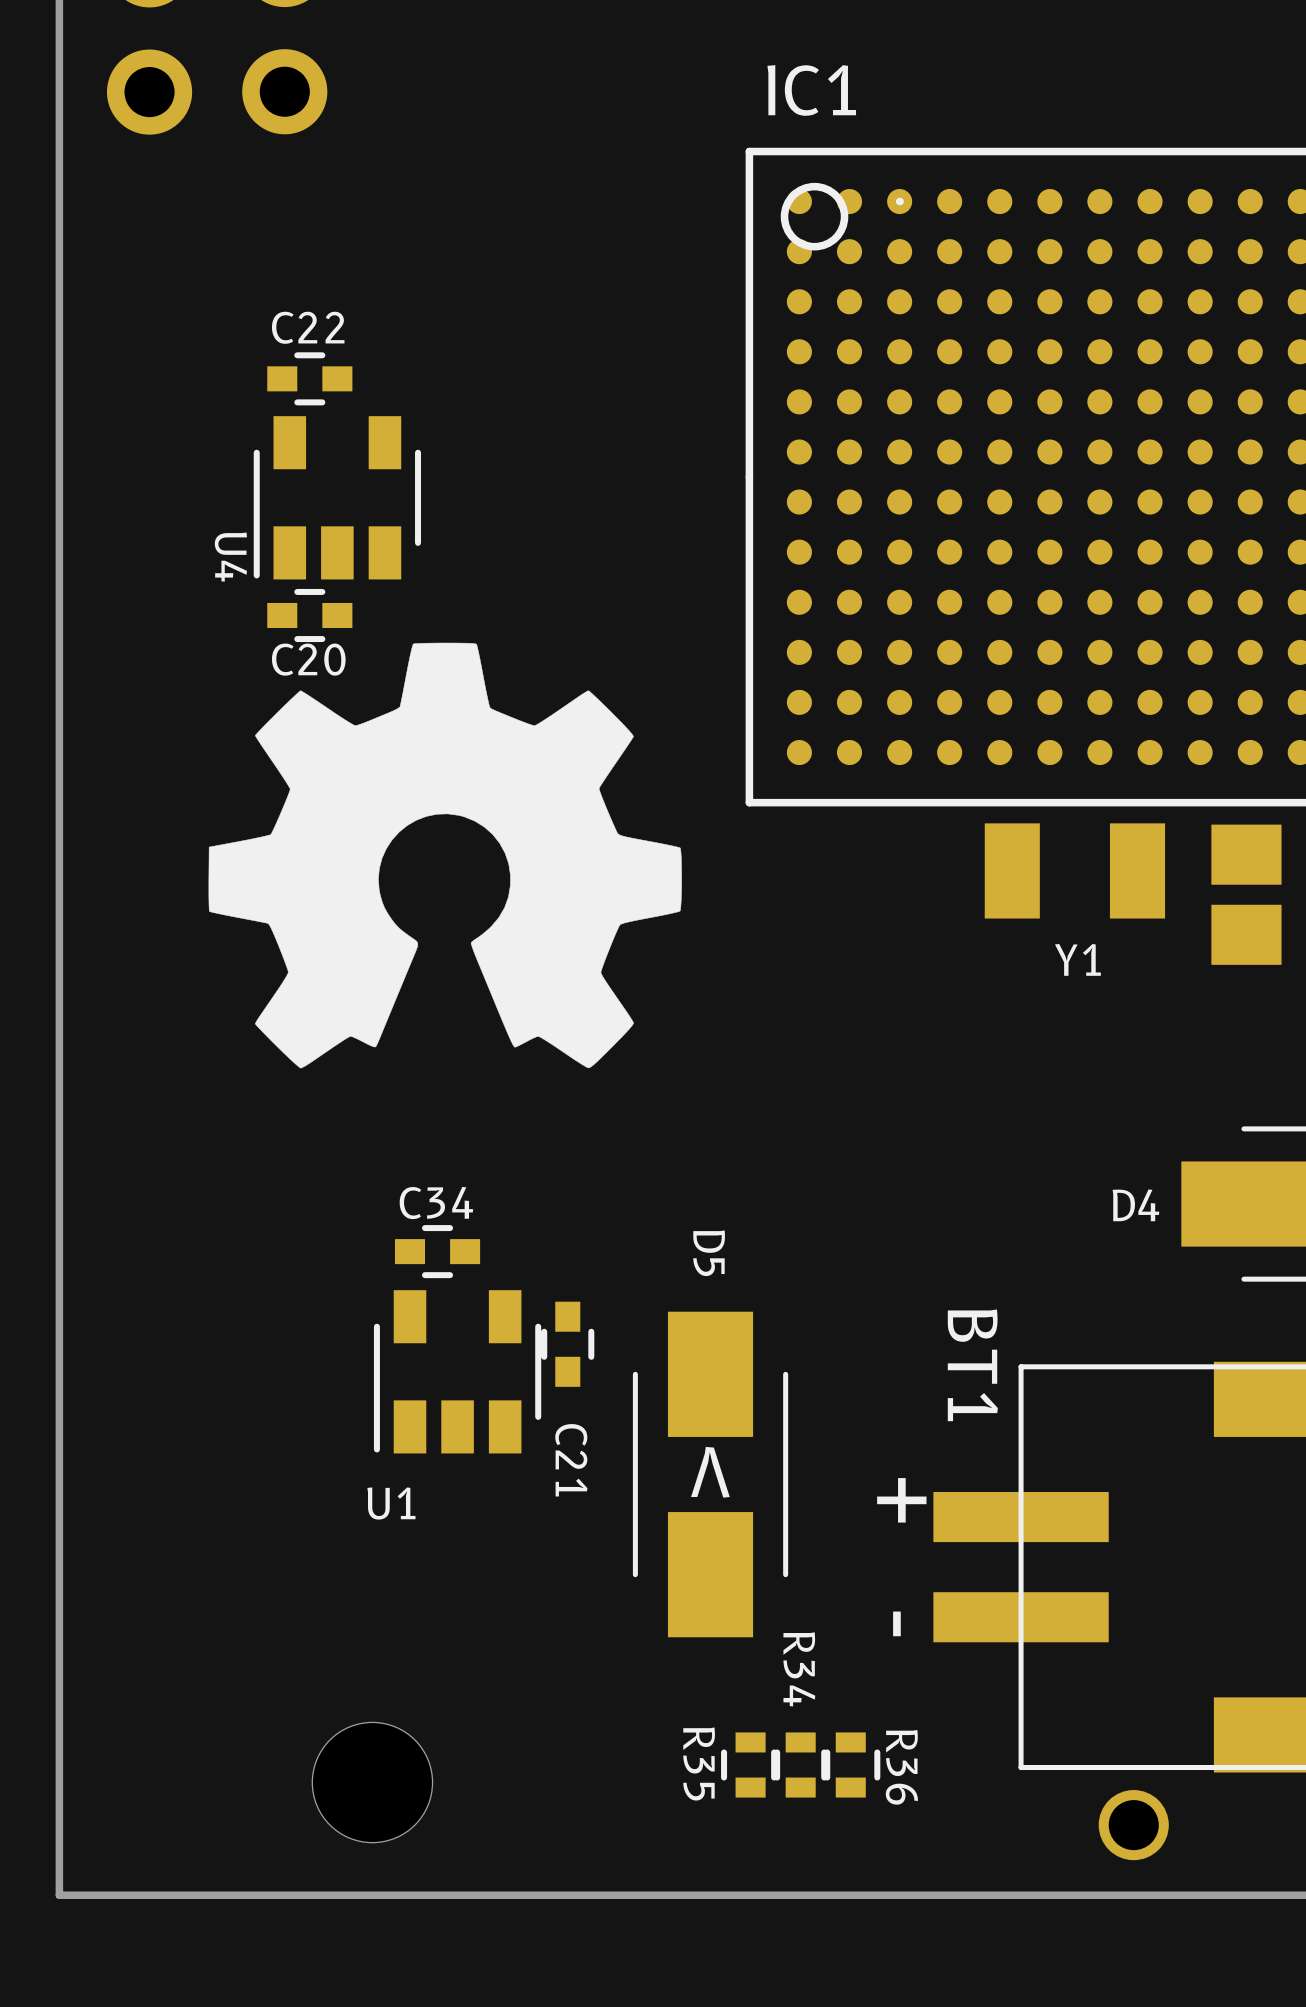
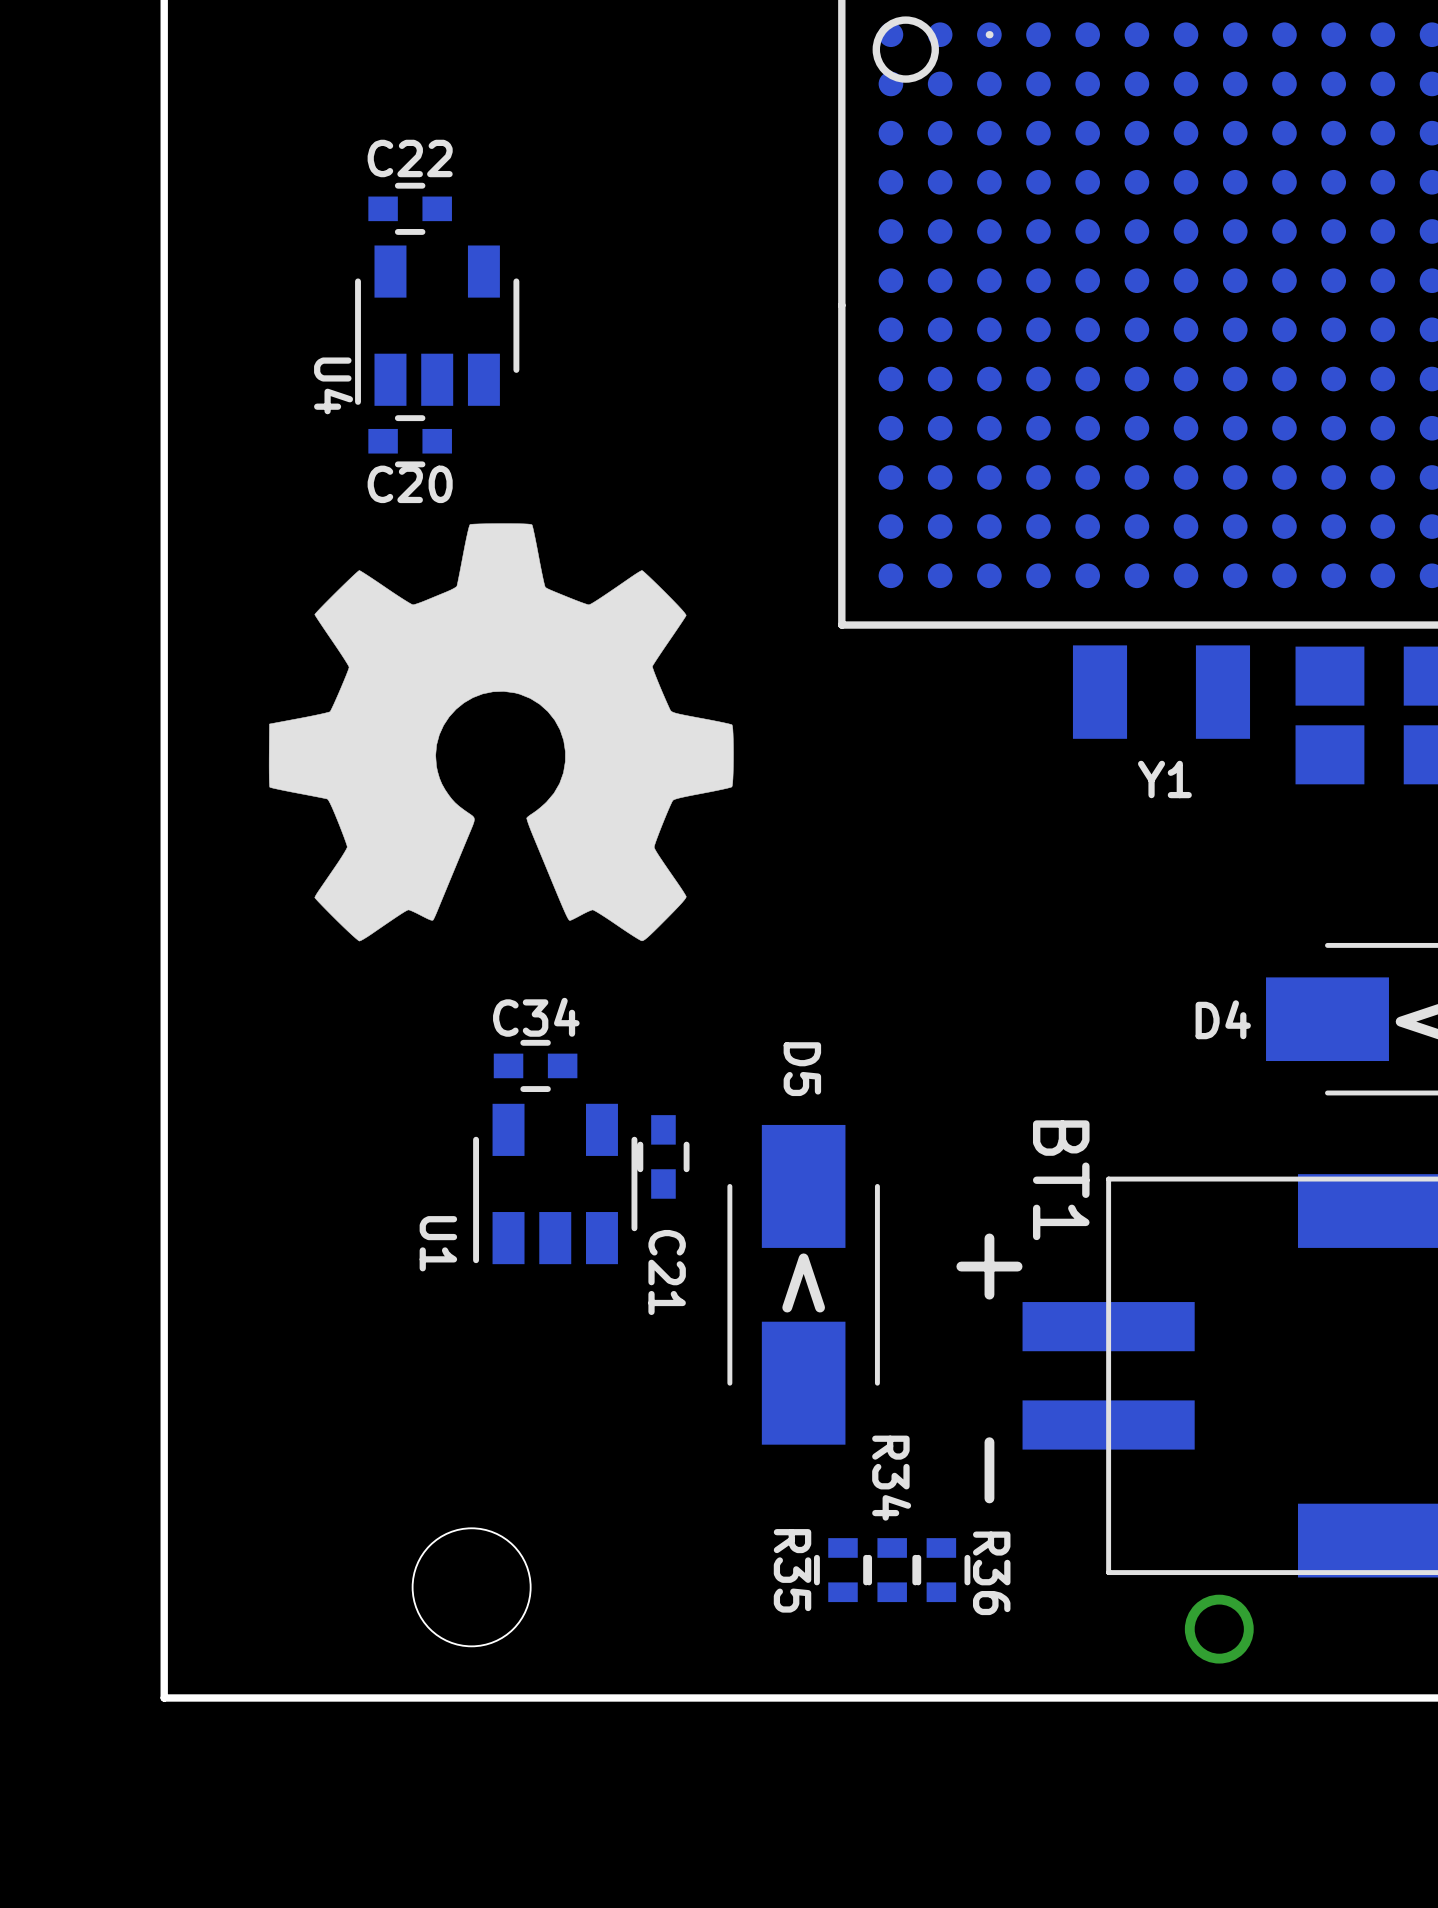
drawing position: (445, 855) -> (501, 732)
U1 name rotation: 0° (391, 1503) -> 90° clockwise (438, 1243)
U1 name position: U1 (391, 1503) -> U1 (438, 1243)

